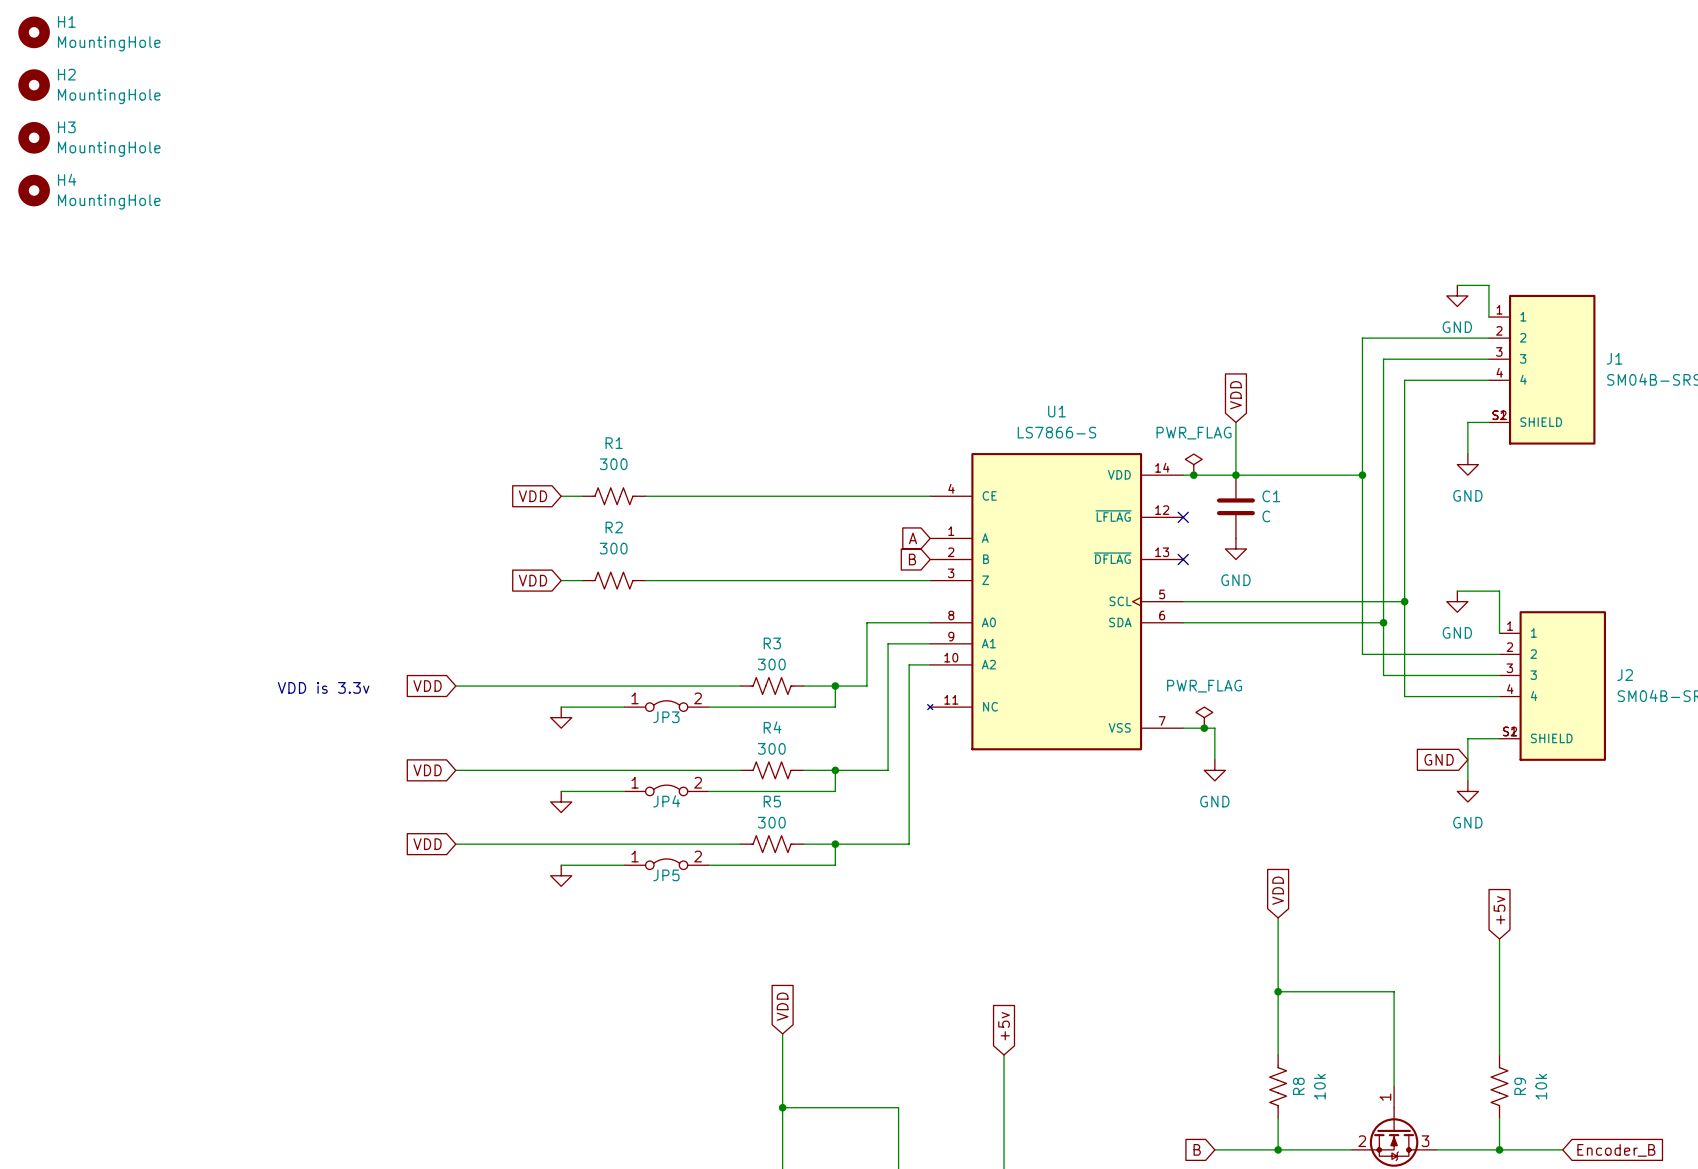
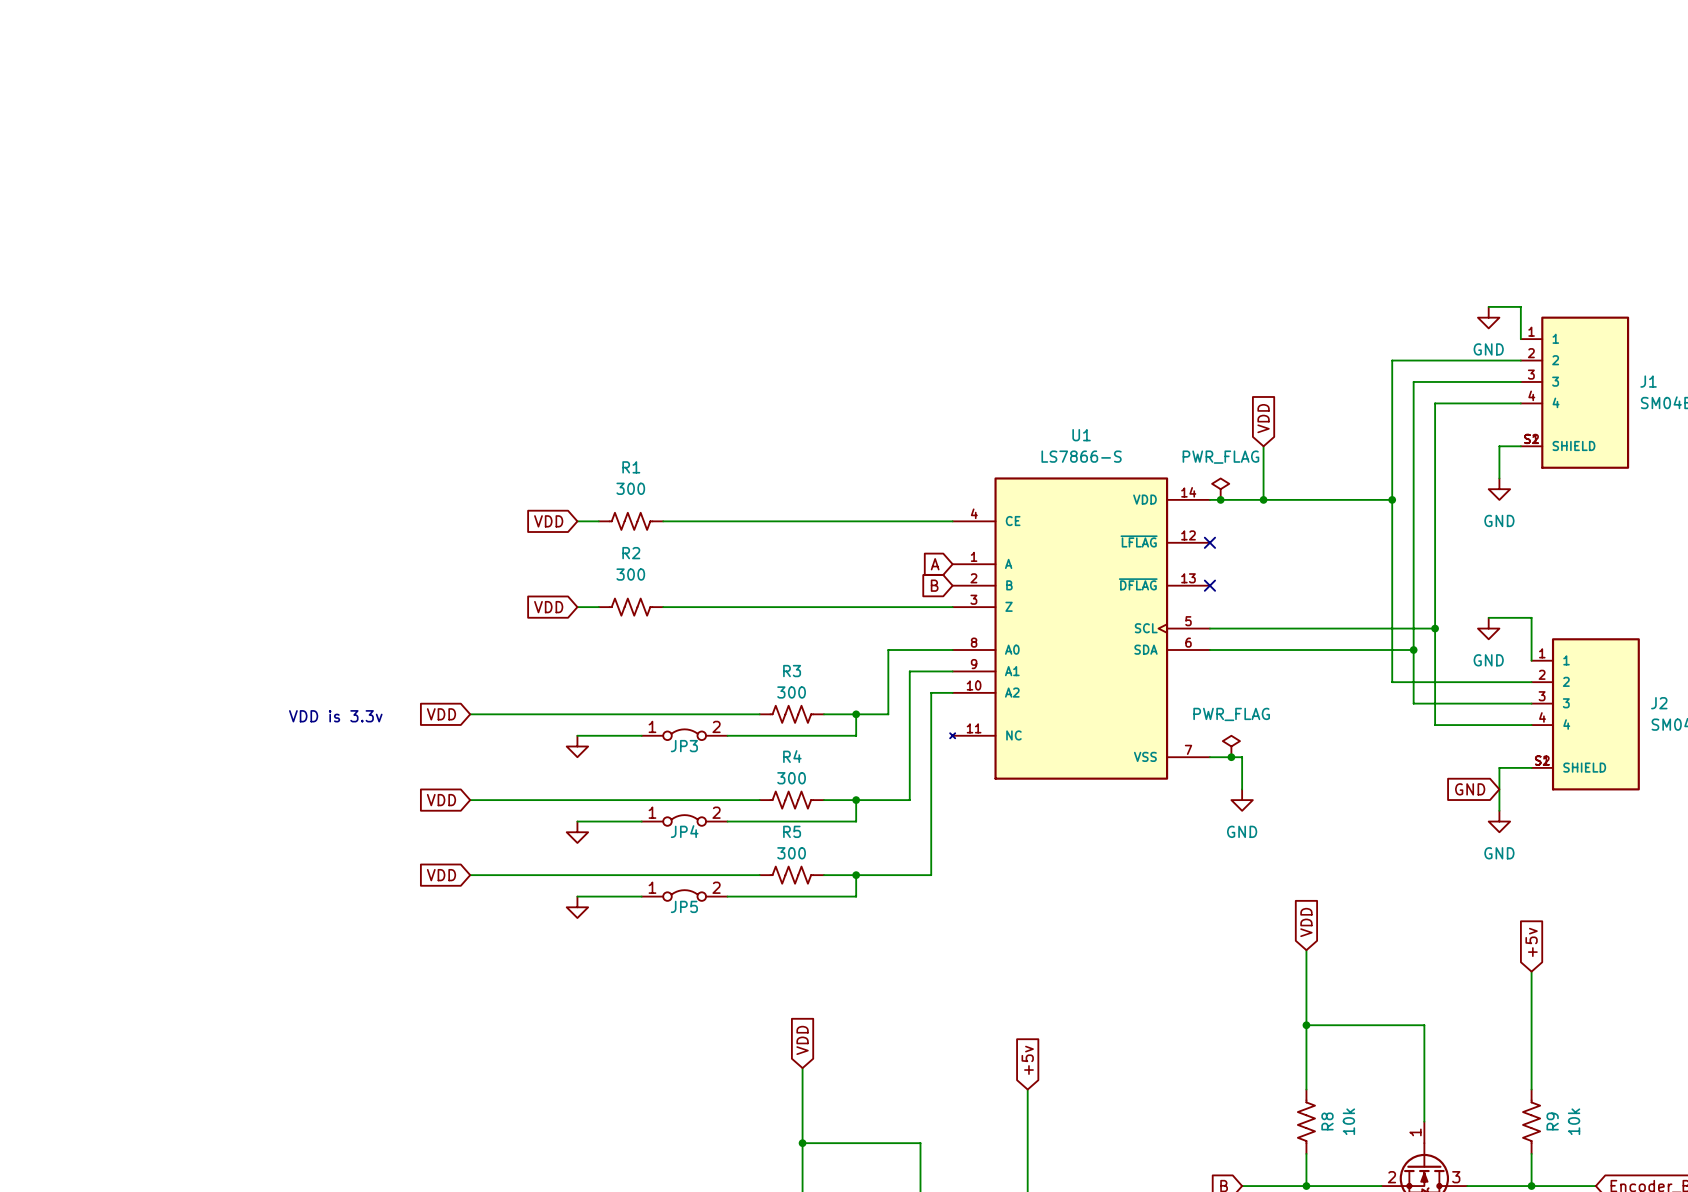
H1: MountingHole (34, 32) -> none
H2: MountingHole (34, 85) -> none
H3: MountingHole (34, 137) -> none
H4: MountingHole (34, 190) -> none
C1: C (1235, 506) -> none
power symbol: GND (1235, 548) -> none

